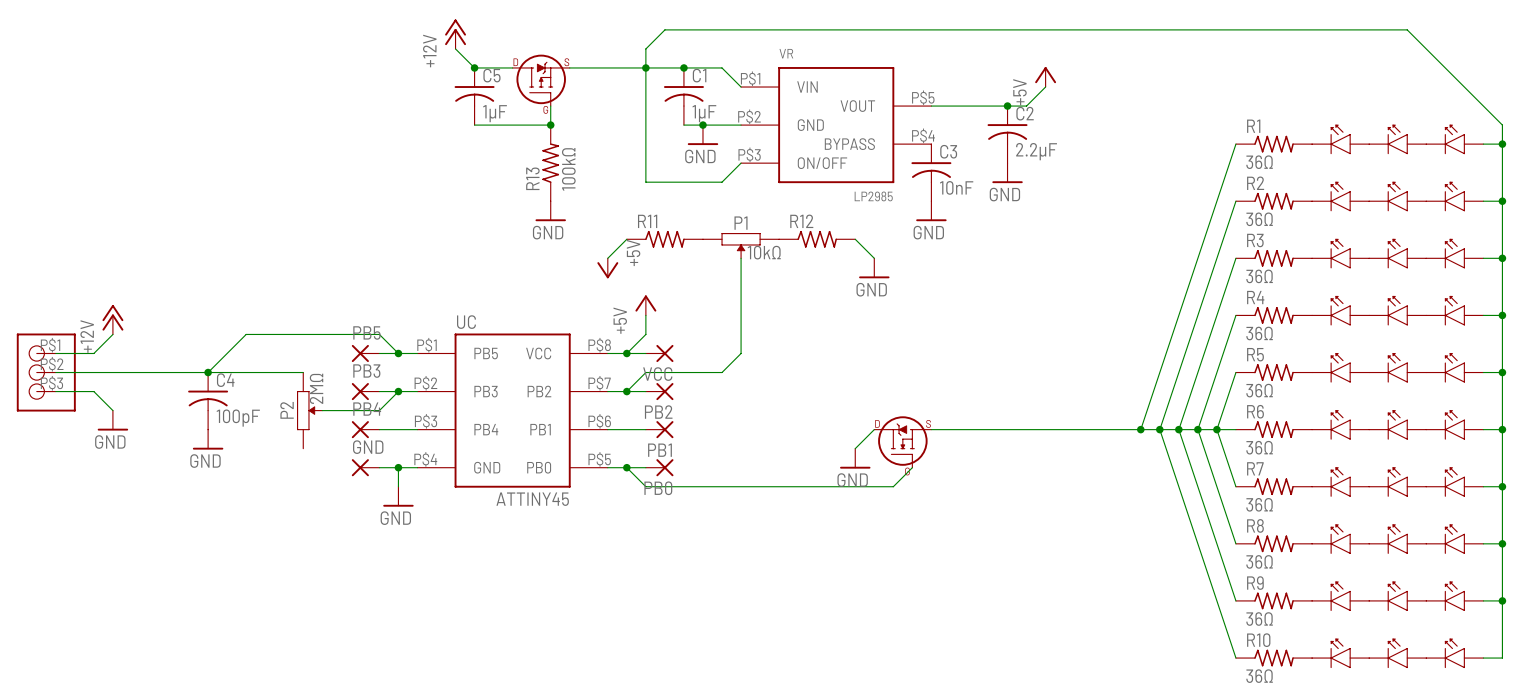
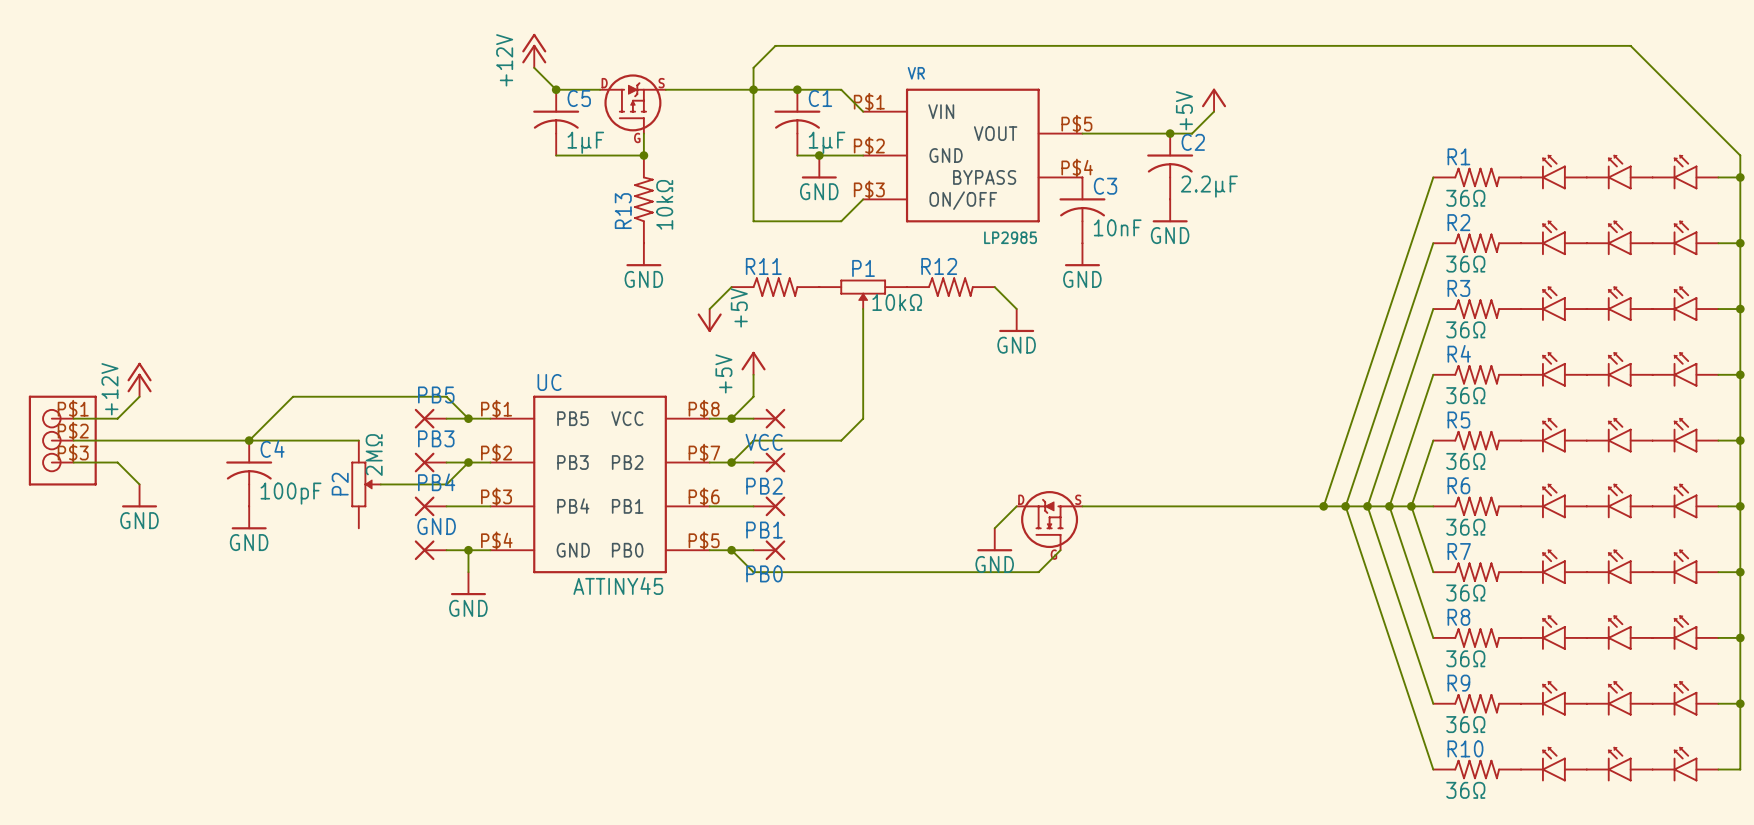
R13 value: 100kΩ (568, 169) -> 10kΩ (664, 204)

